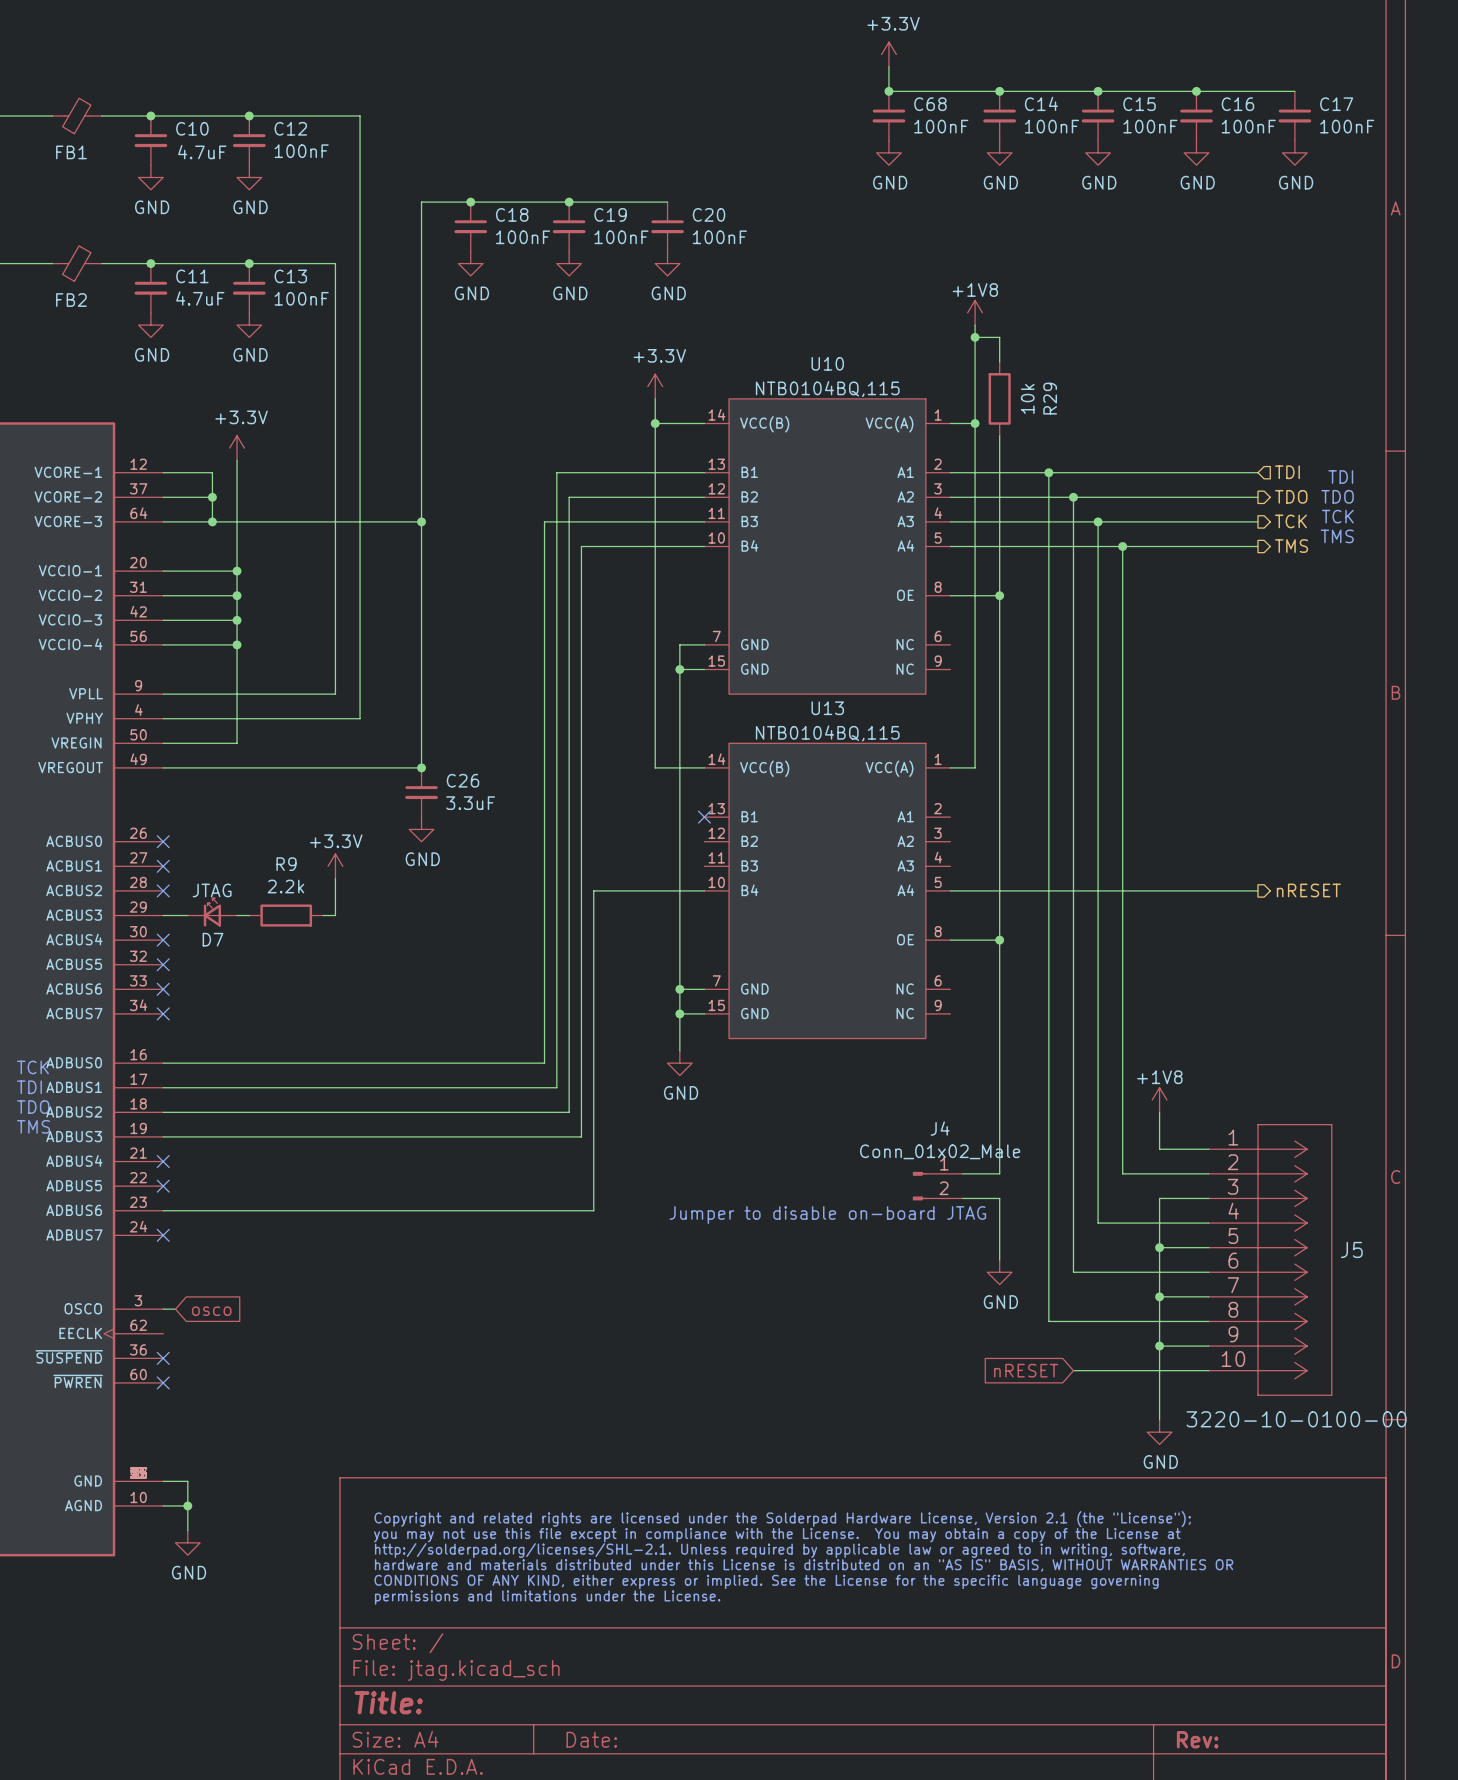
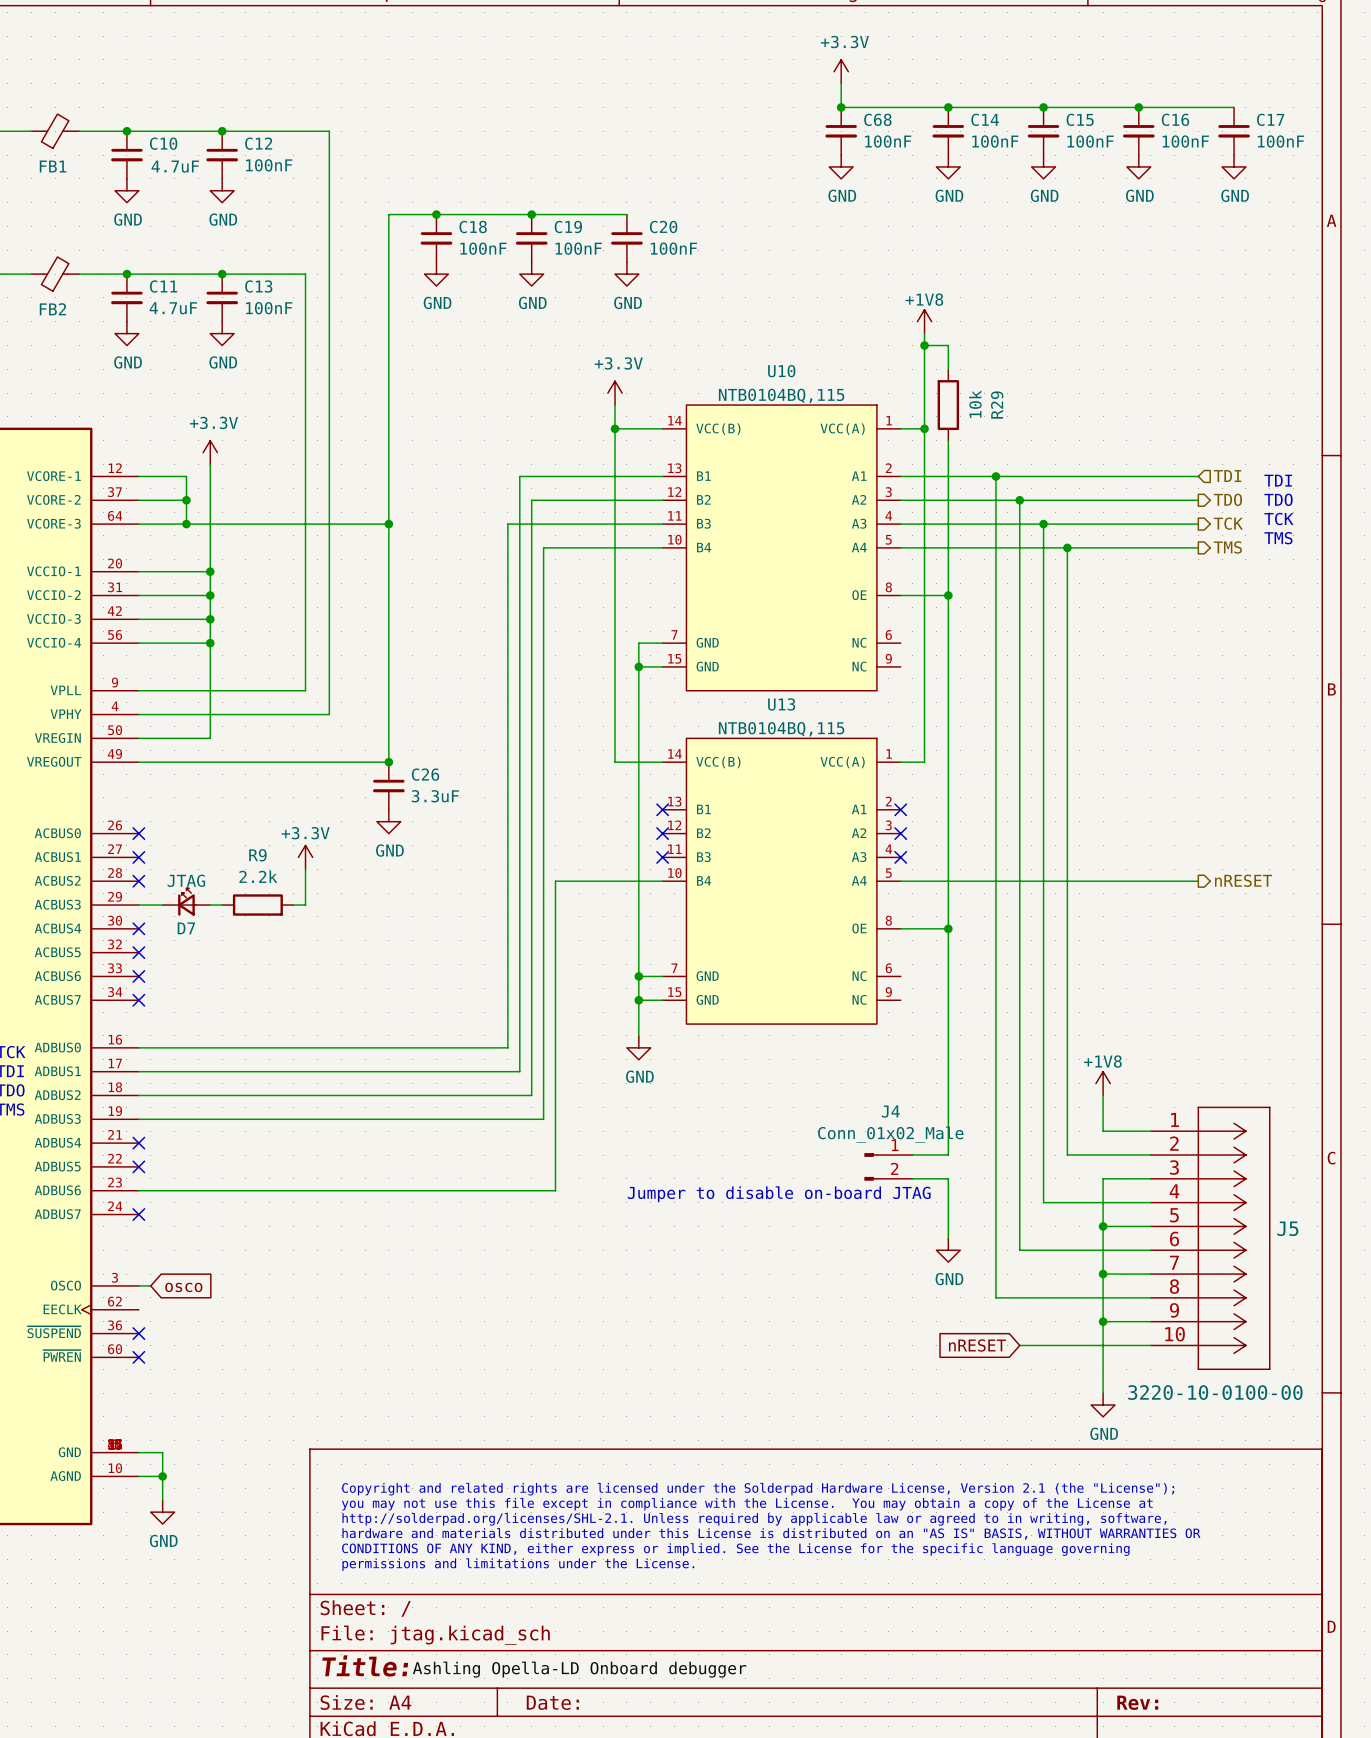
no-connect mark: none -> (900, 809)
no-connect mark: none -> (662, 833)
no-connect mark: none -> (900, 833)
no-connect mark: none -> (662, 857)
no-connect mark: none -> (900, 857)
label: none -> Ashling Opella-LD Onboard debugger (579, 1669)

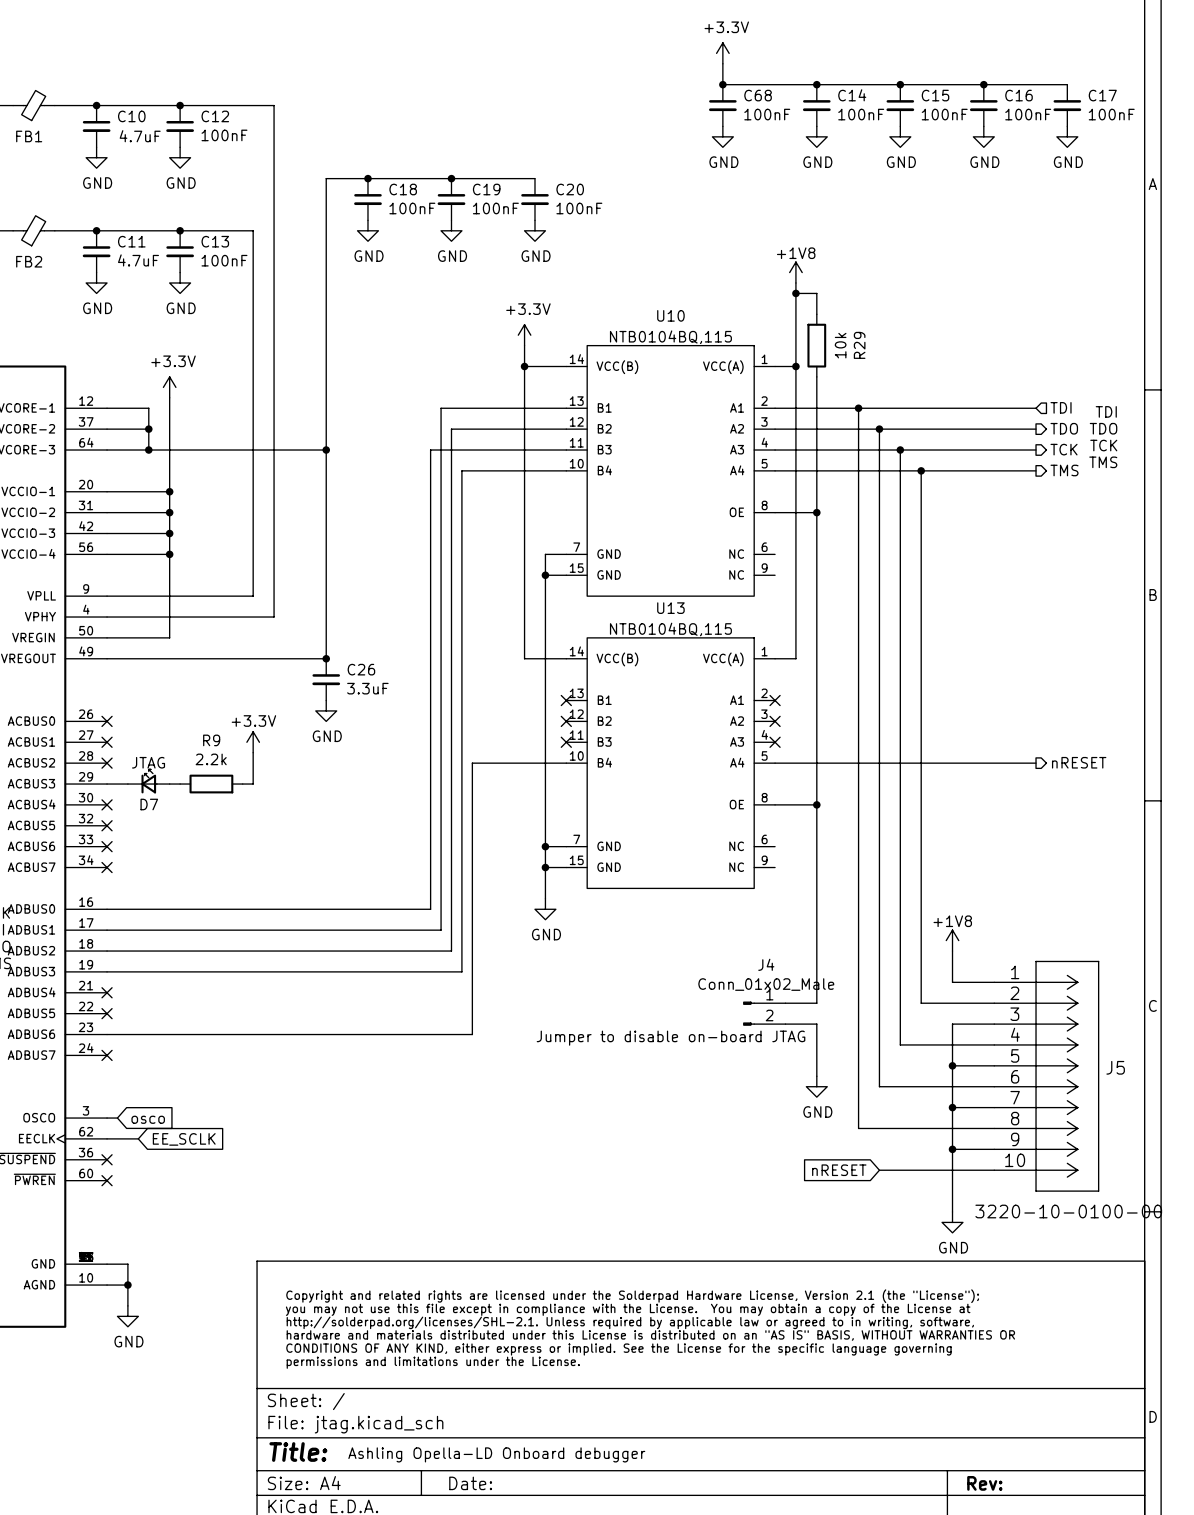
wire: none -> (107, 1138) (138, 1138)
global label: none -> EE_SCLK (184, 1139)

